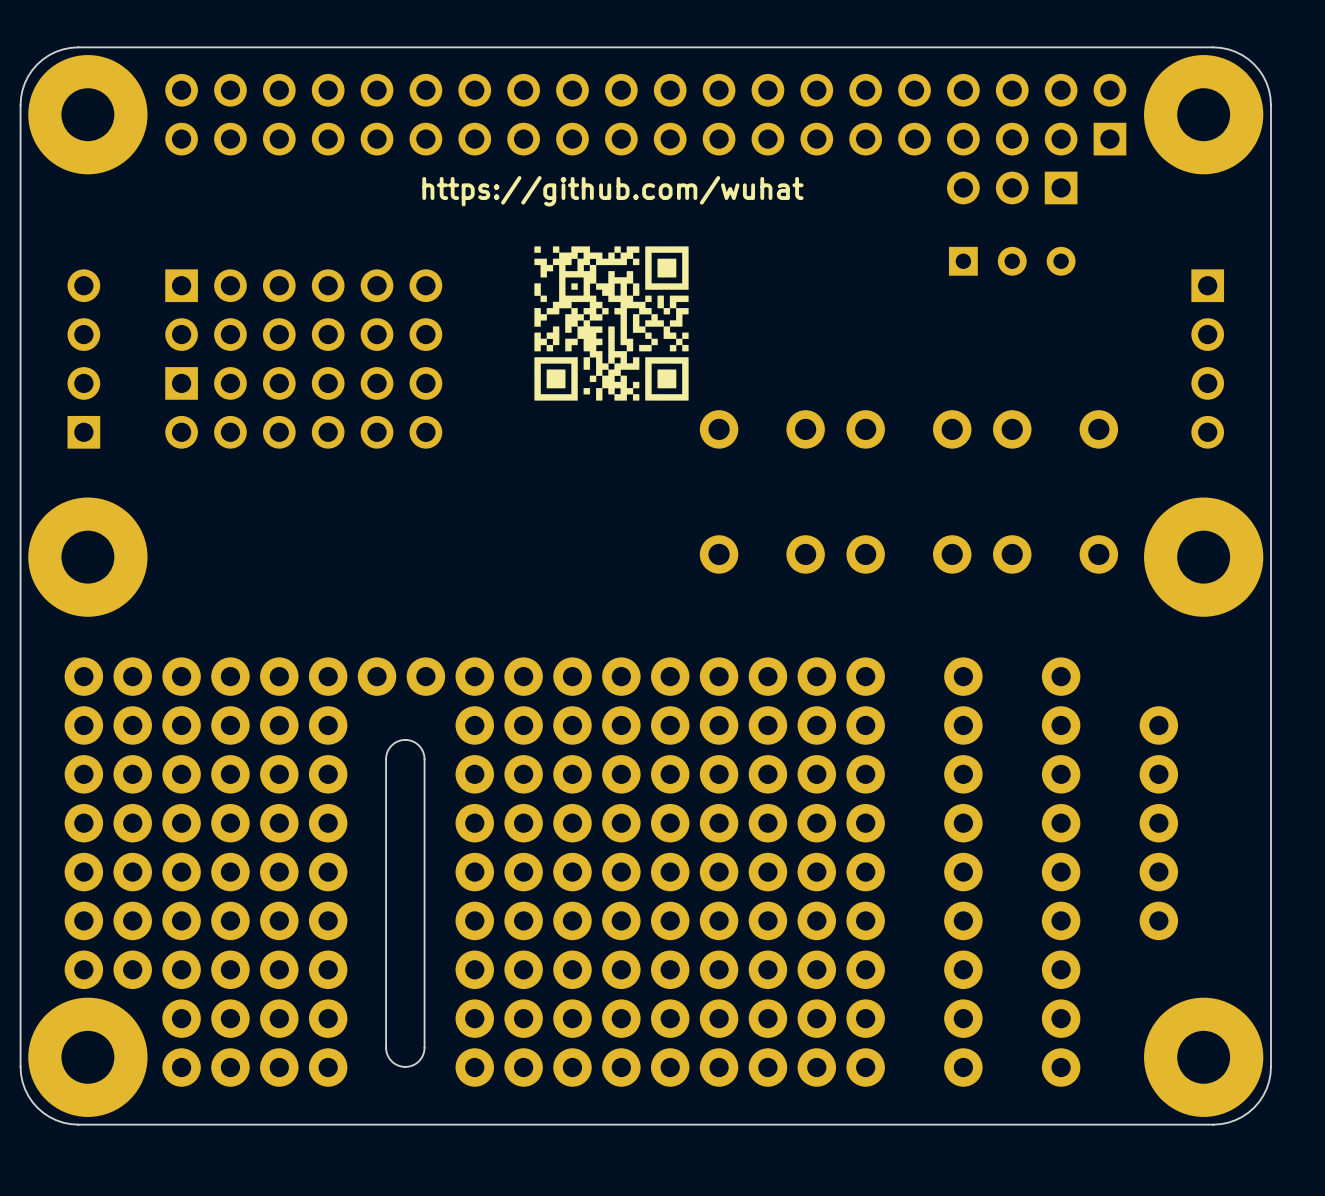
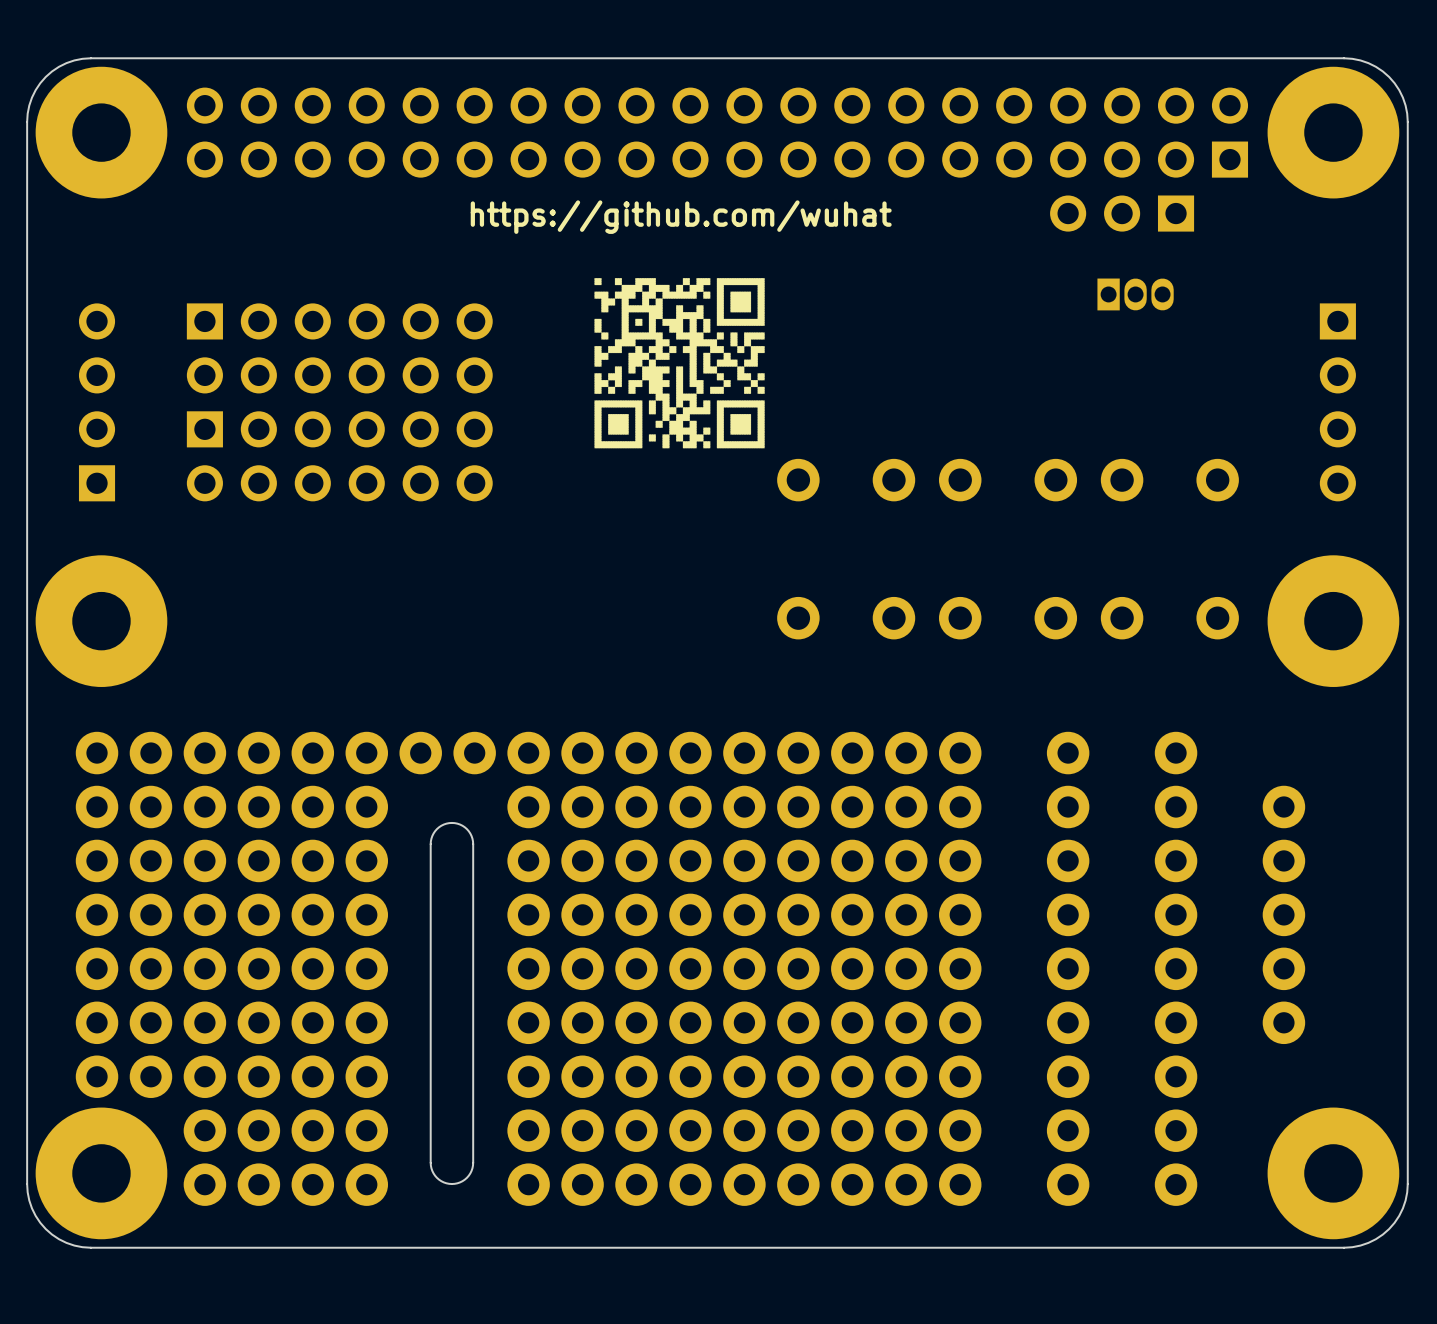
part footprint: [948, 246, 1076, 276] -> [1097, 278, 1174, 311]

